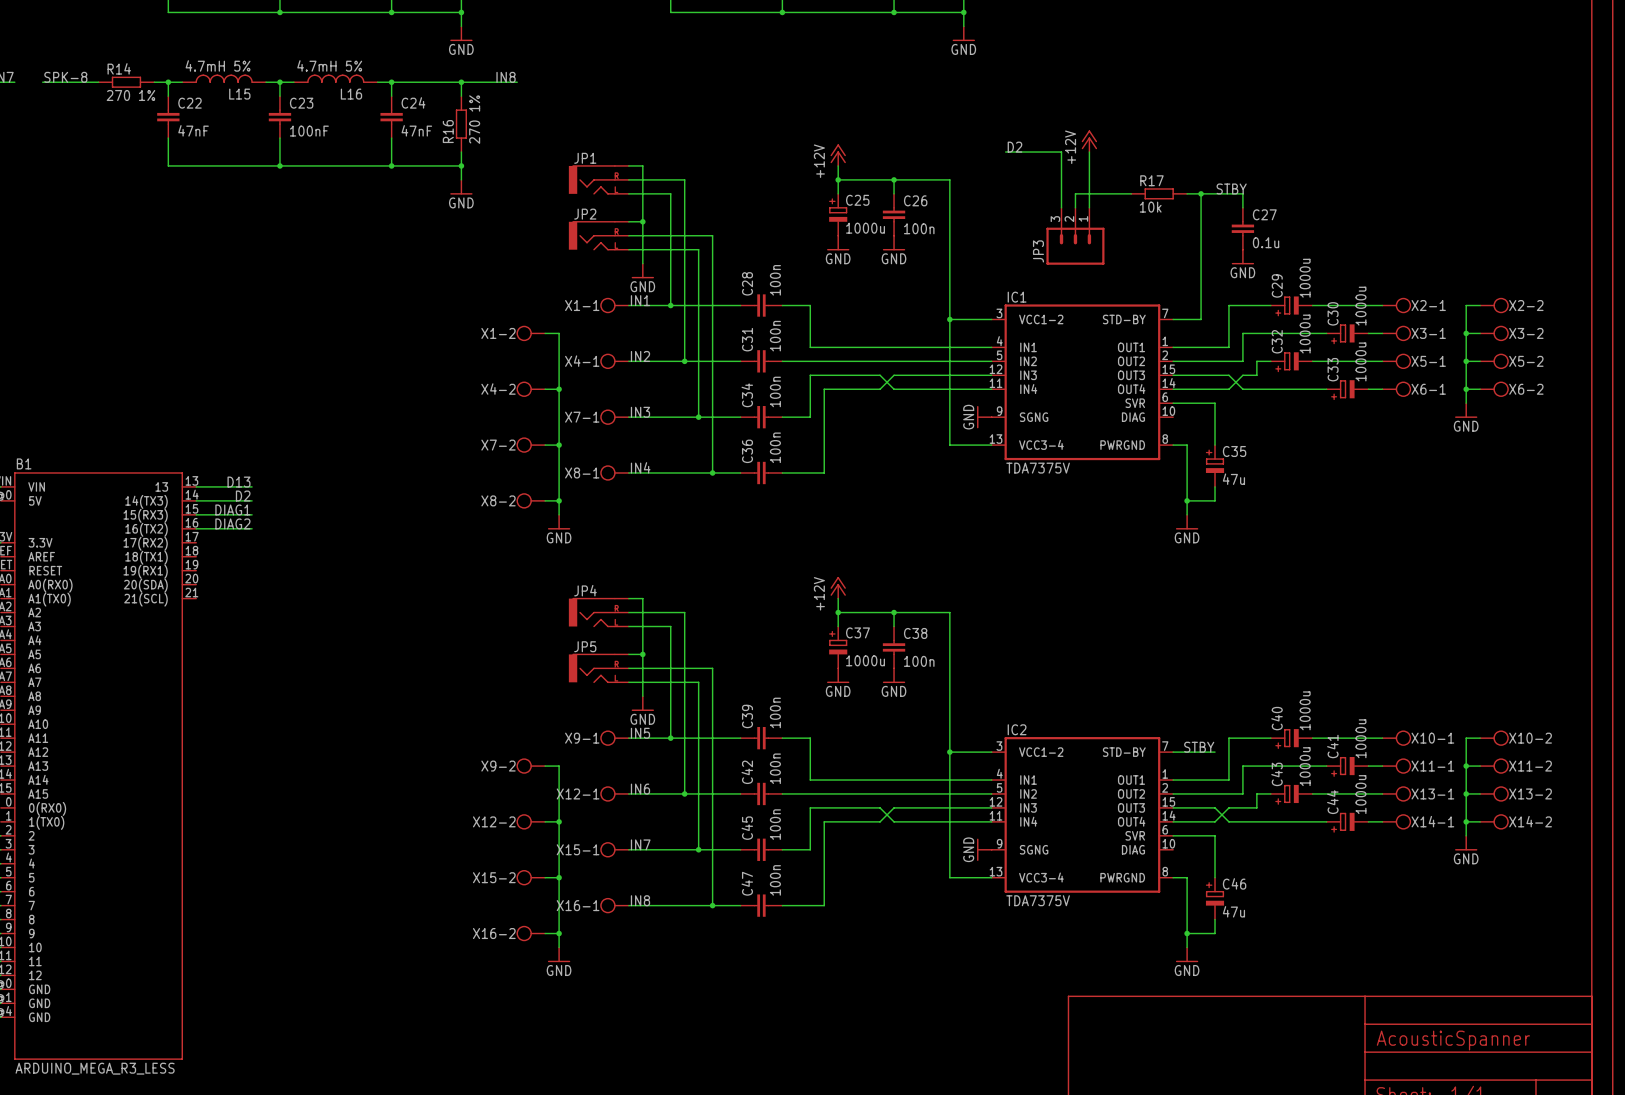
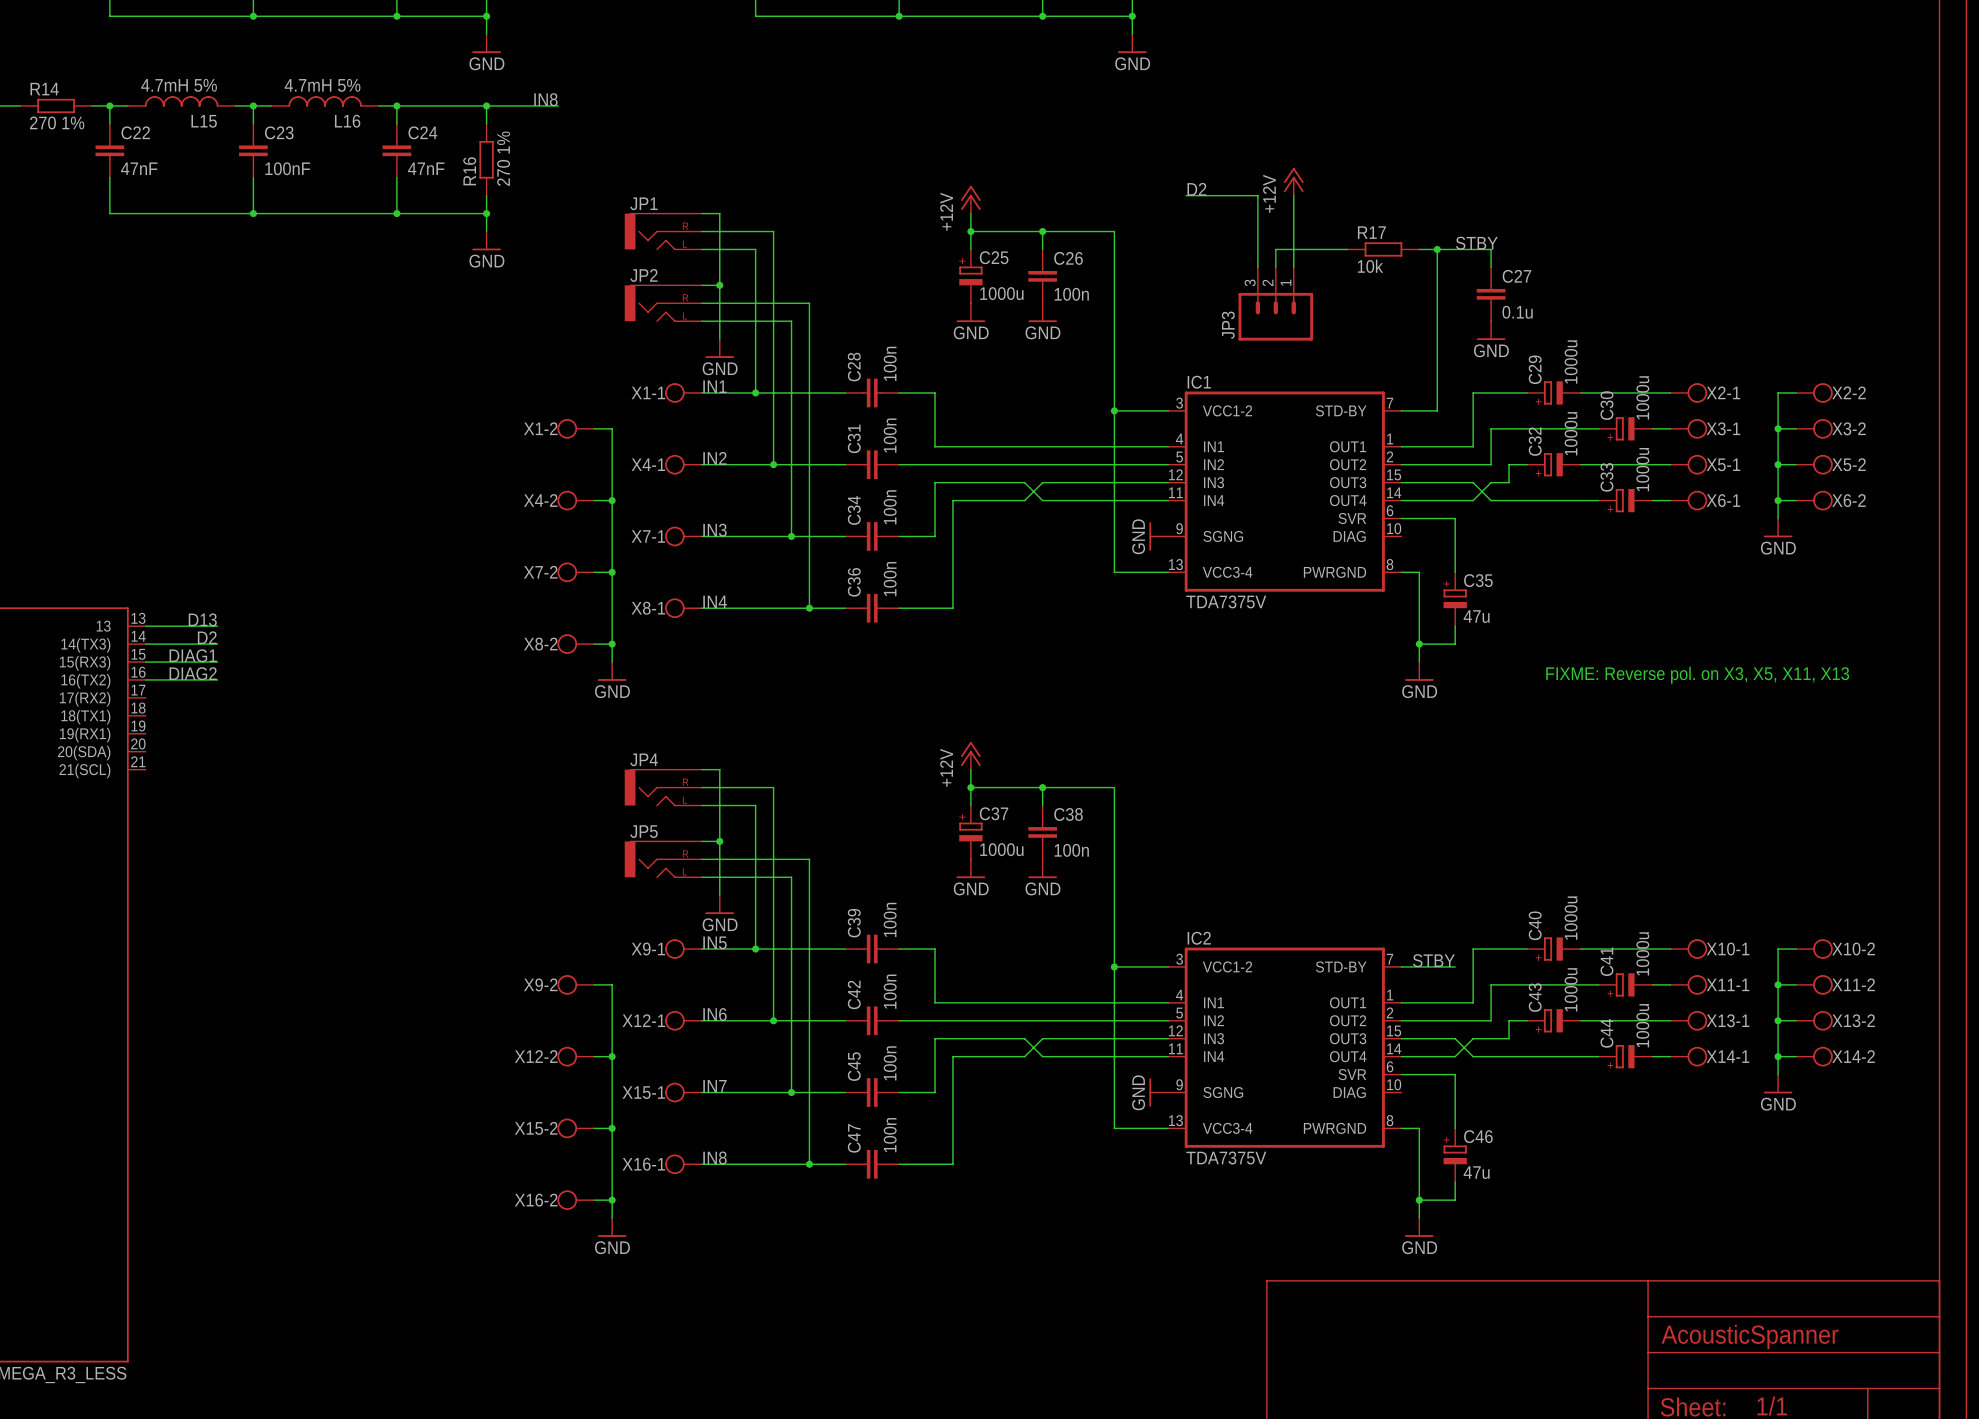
text: none -> FIXME: Reverse pol. on X3, X5, X11, X13 (1697, 675)

